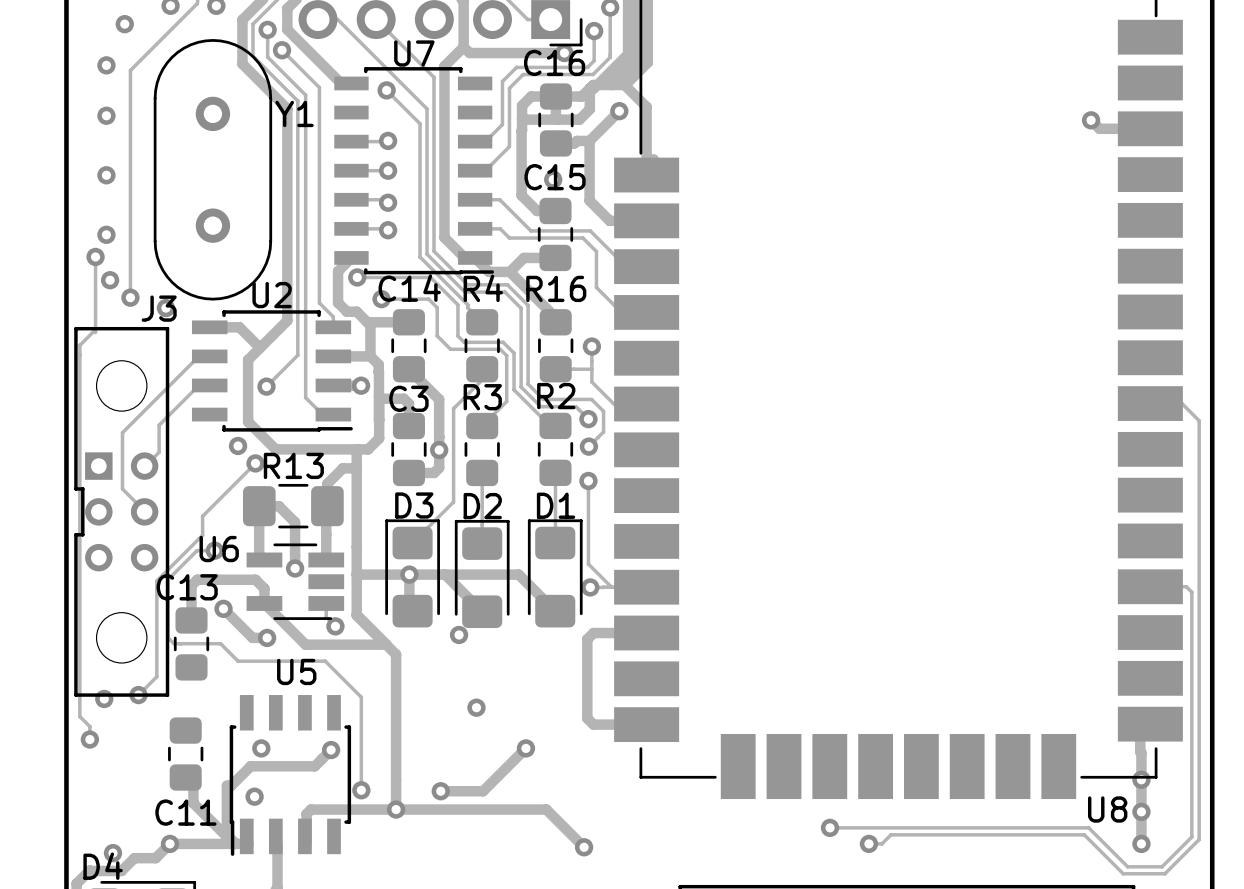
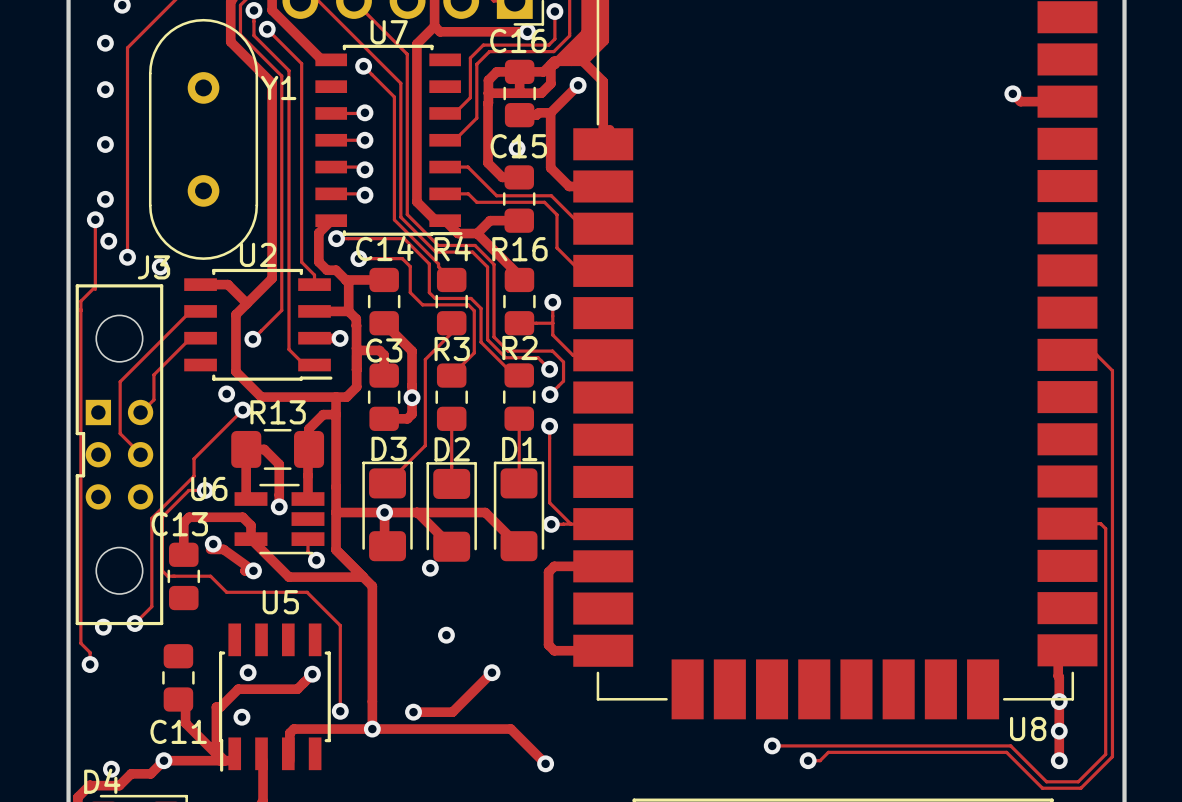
track: (223, 608) (252, 637) (257, 637) -> none
track: none -> (210, 549) (223, 549) (253, 570)

